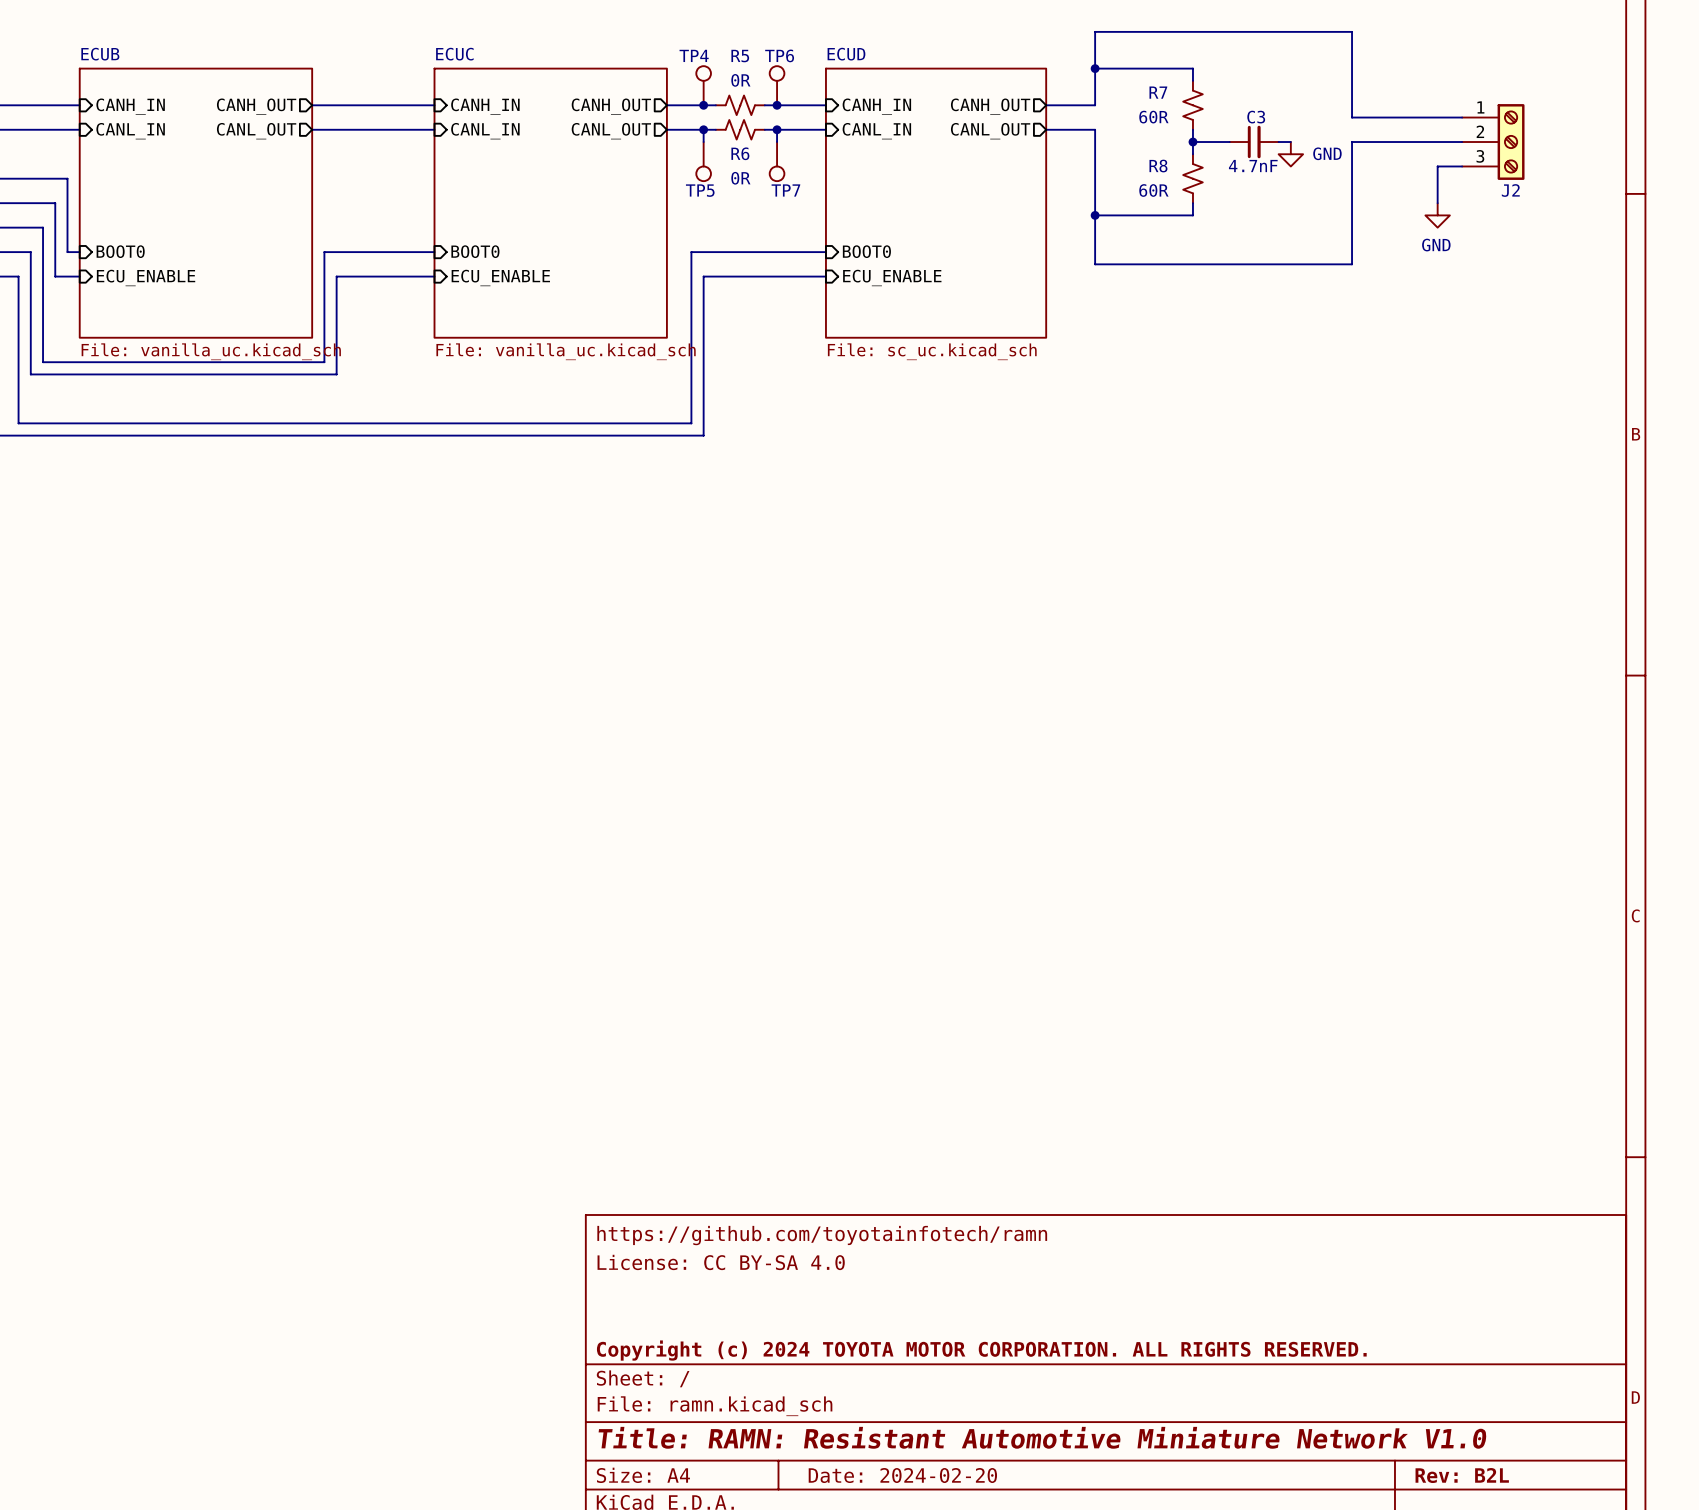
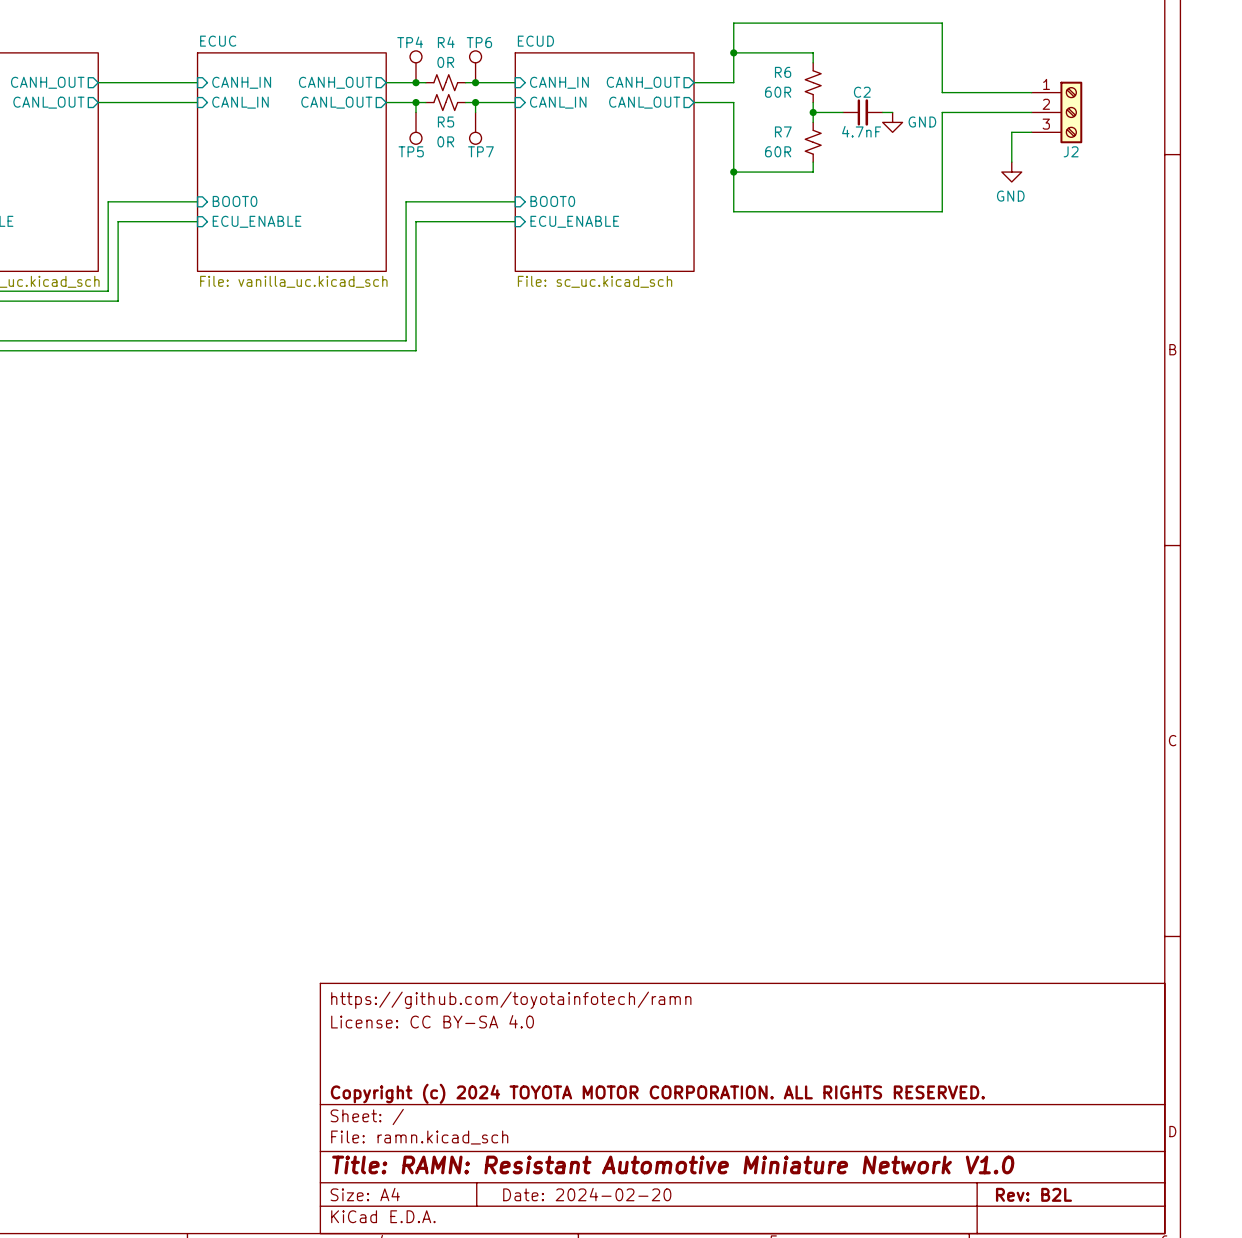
R5 name: R5 (740, 56) -> R4 (446, 42)
R7 name: R7 (1158, 92) -> R6 (783, 72)
C3 name: C3 (1256, 117) -> C2 (862, 92)
R6 name: R6 (740, 153) -> R5 (446, 122)
R8 name: R8 (1158, 166) -> R7 (783, 131)

